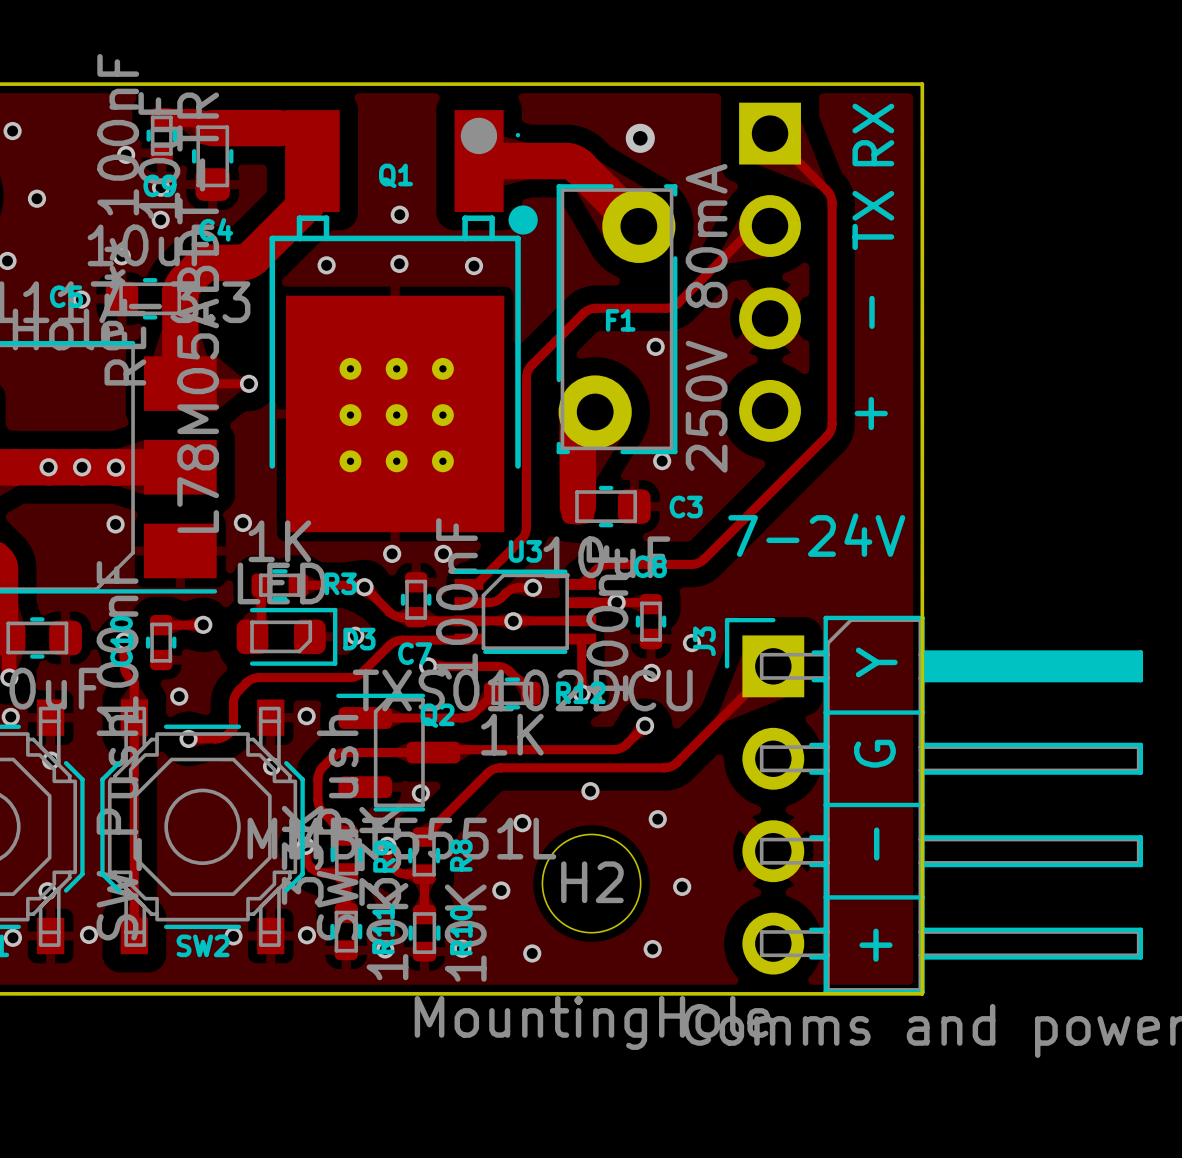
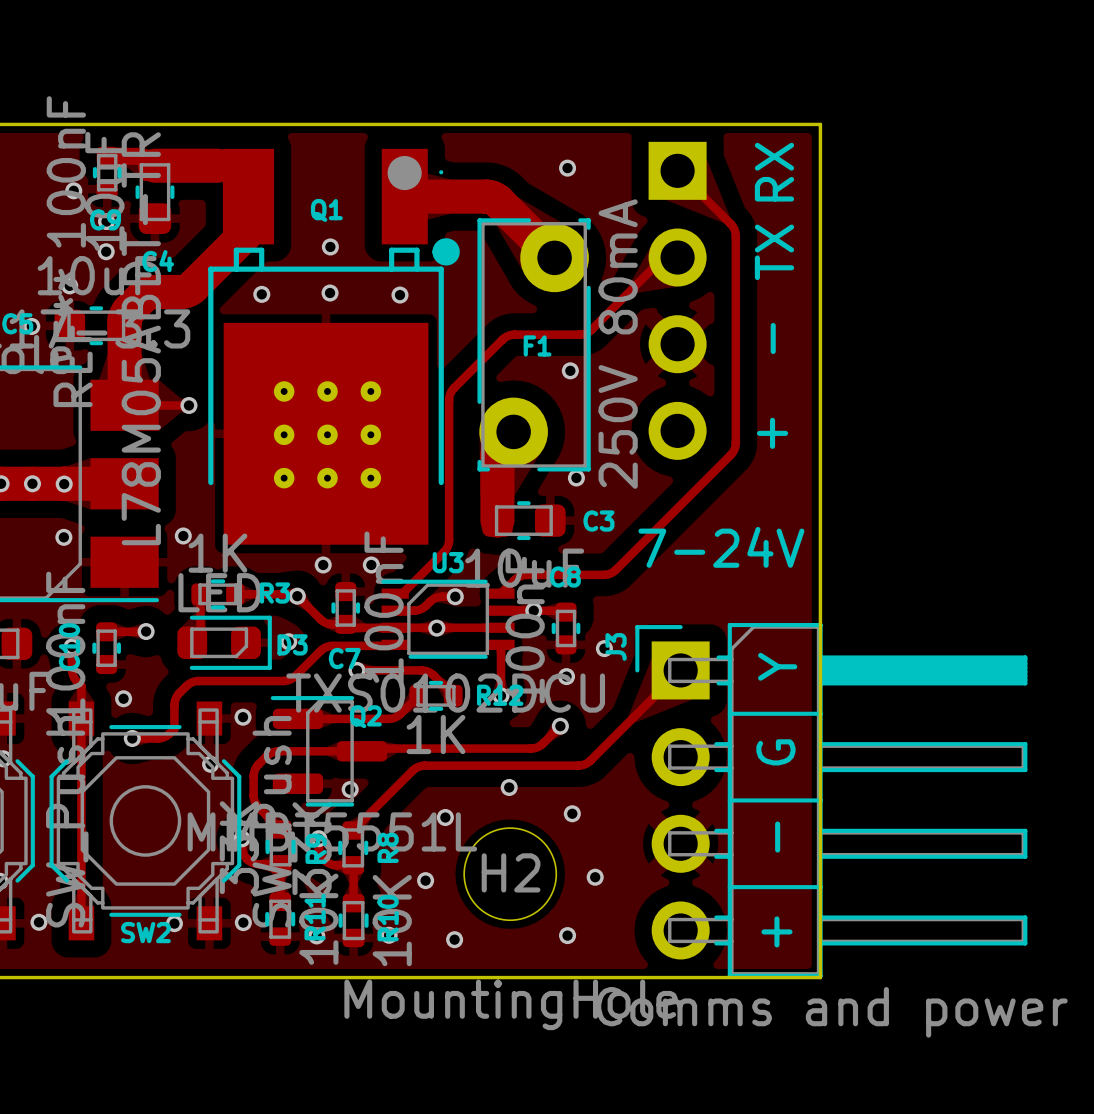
via size: [625, 123, 655, 153] -> [559, 159, 577, 177]

